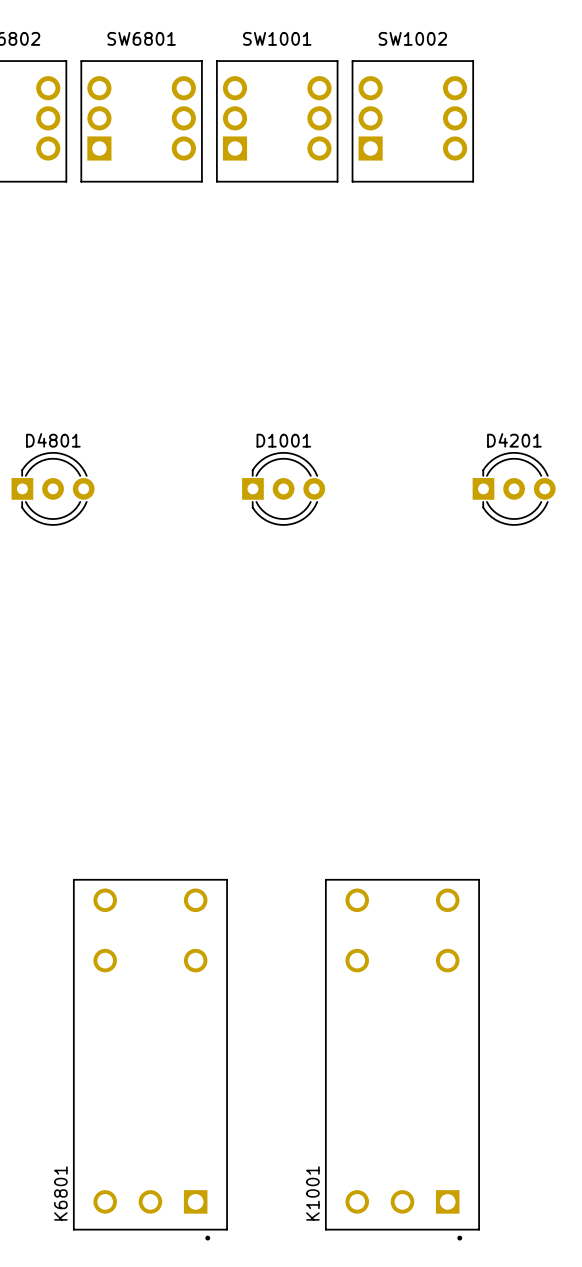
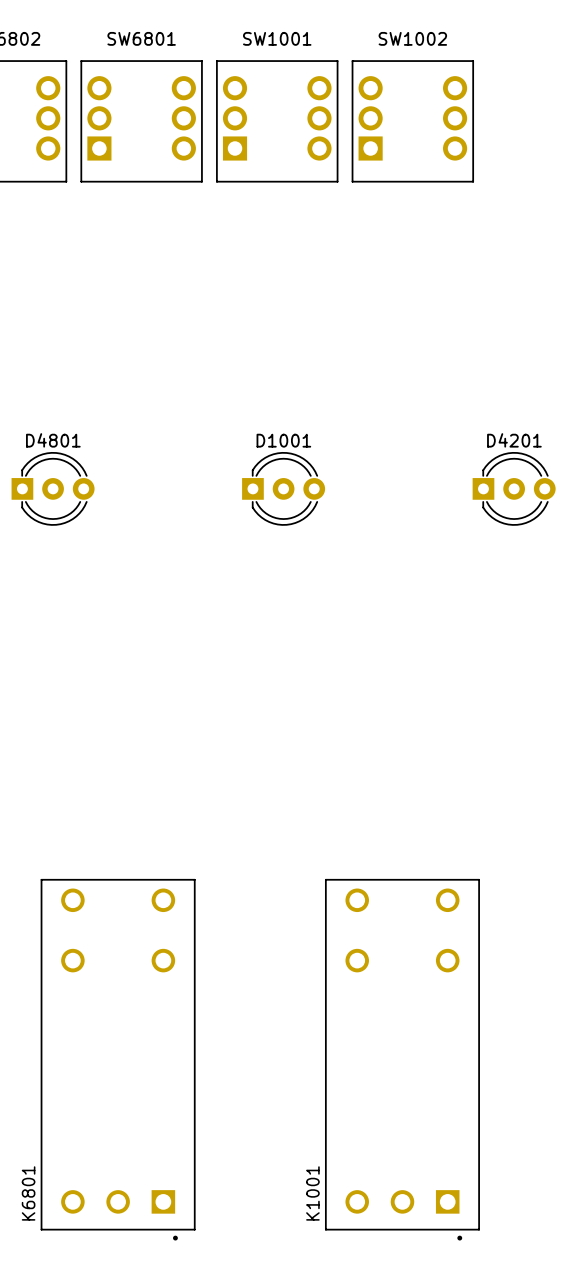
K6801 position: (150, 1059) -> (118, 1059)

